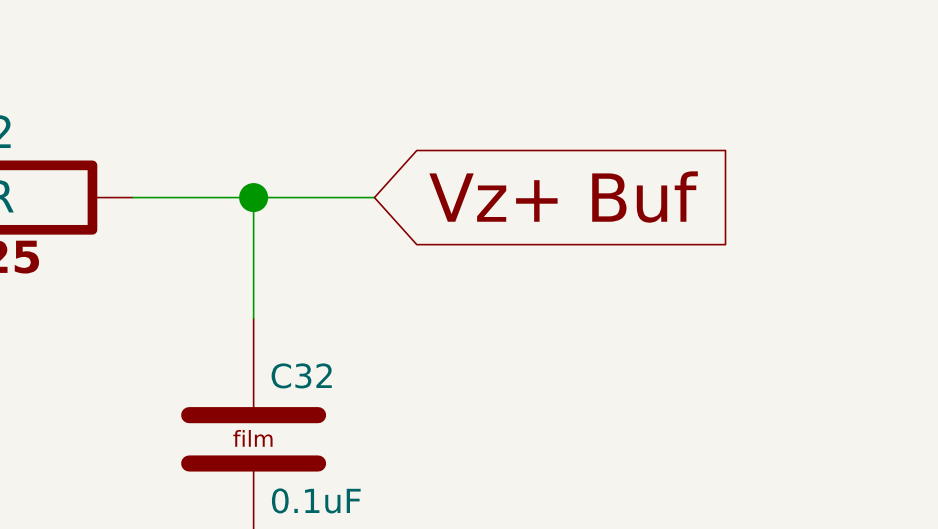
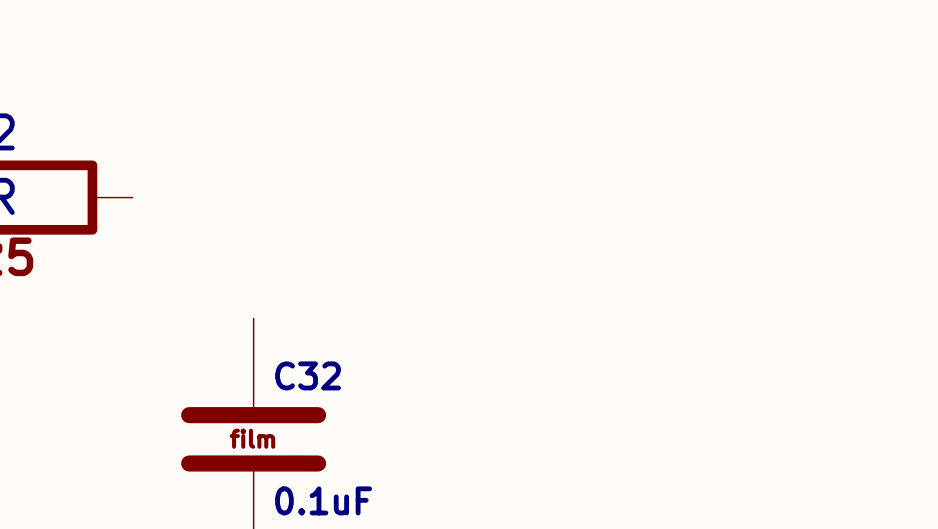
wire: (132, 197) (374, 197) -> none
wire: (253, 197) (253, 318) -> none
junction: (253, 197) -> none
global label: Vz+ Buf (563, 197) -> none

